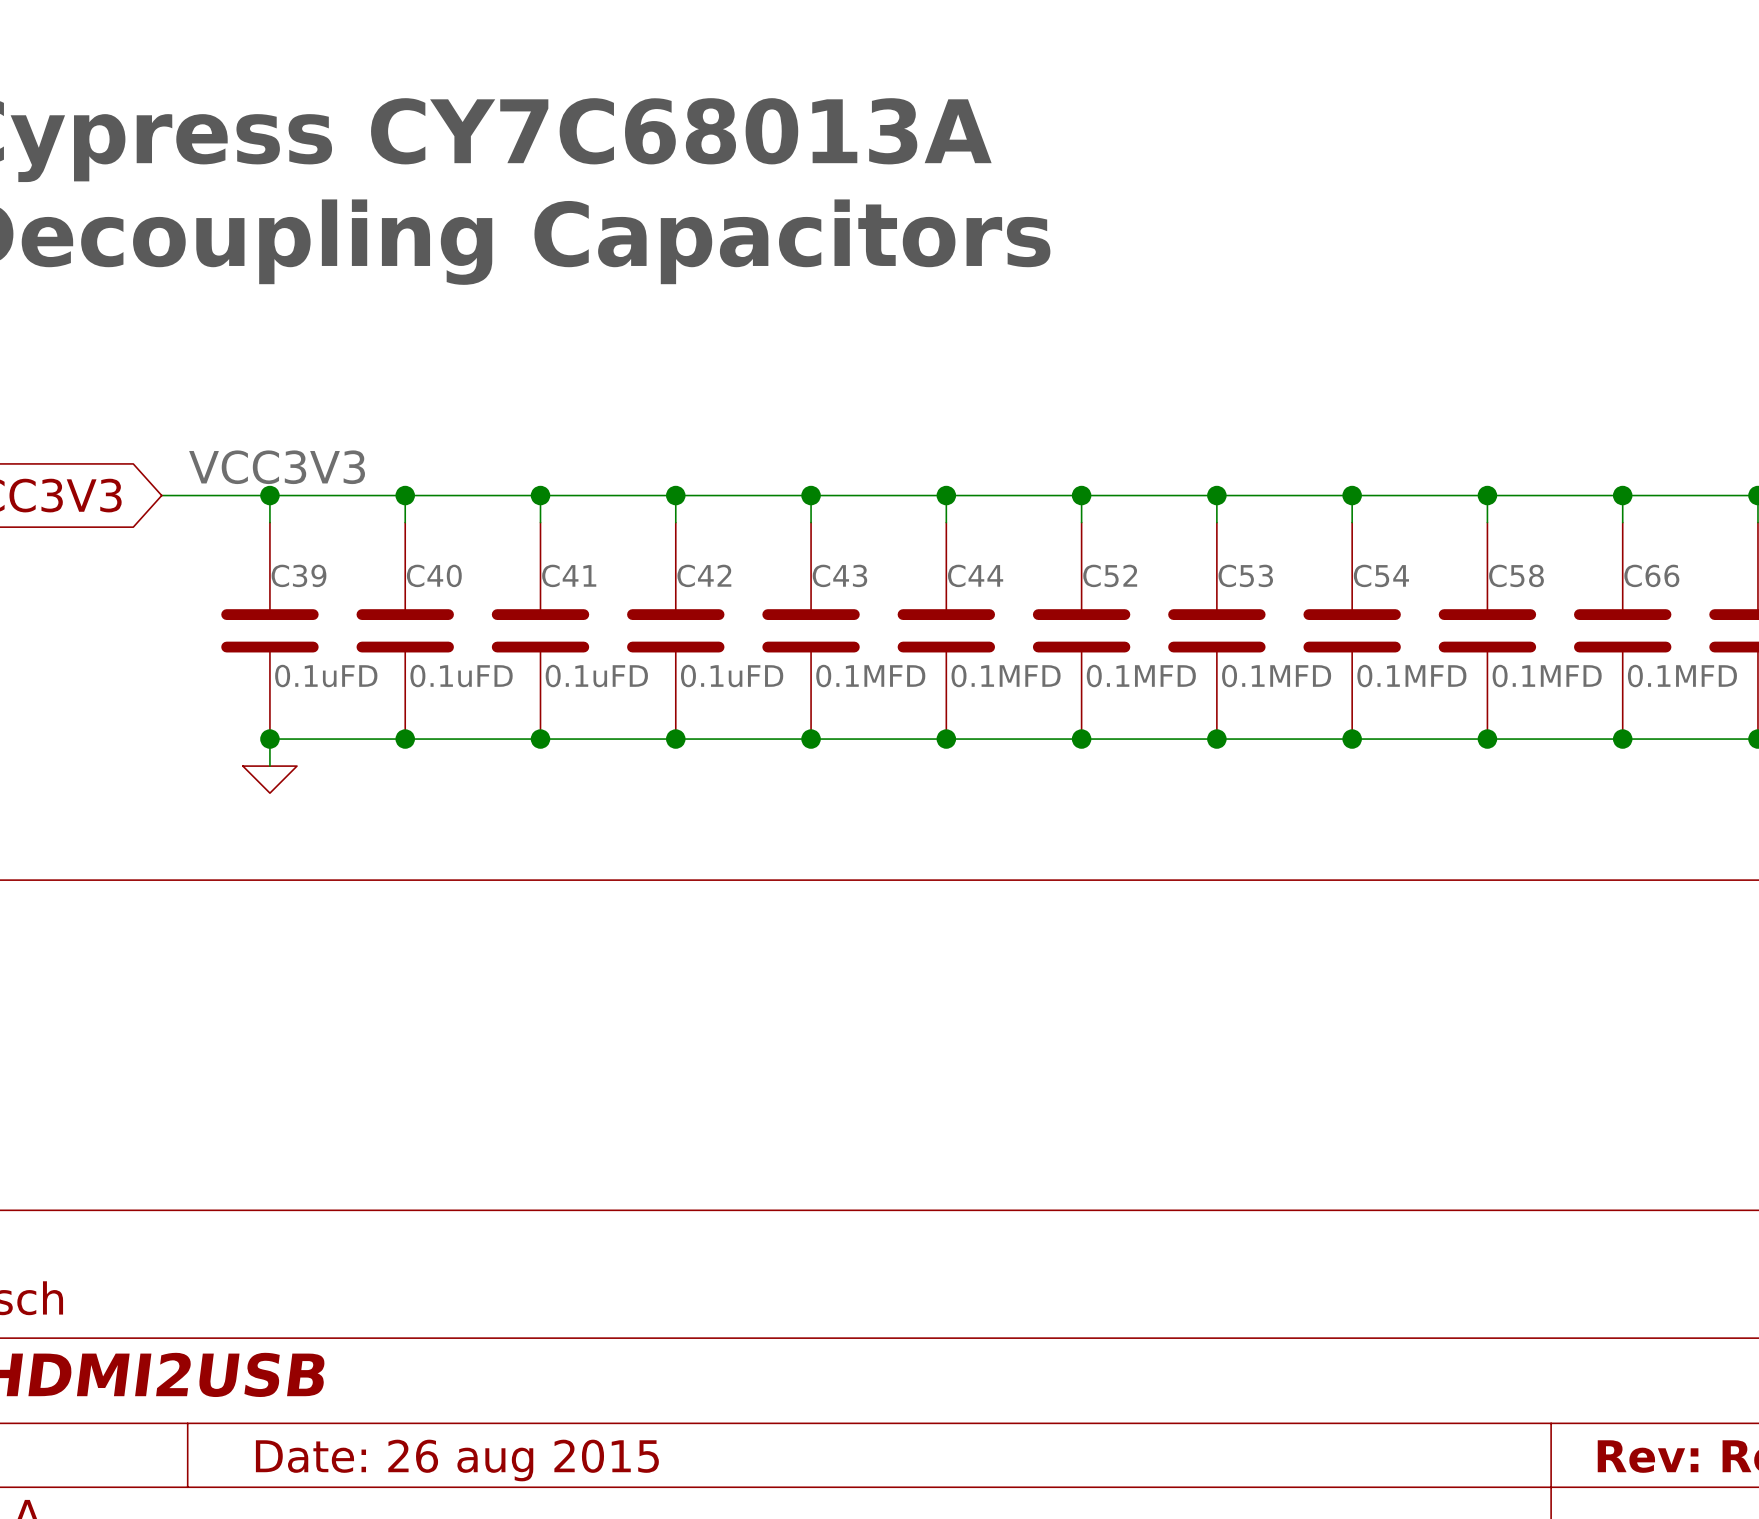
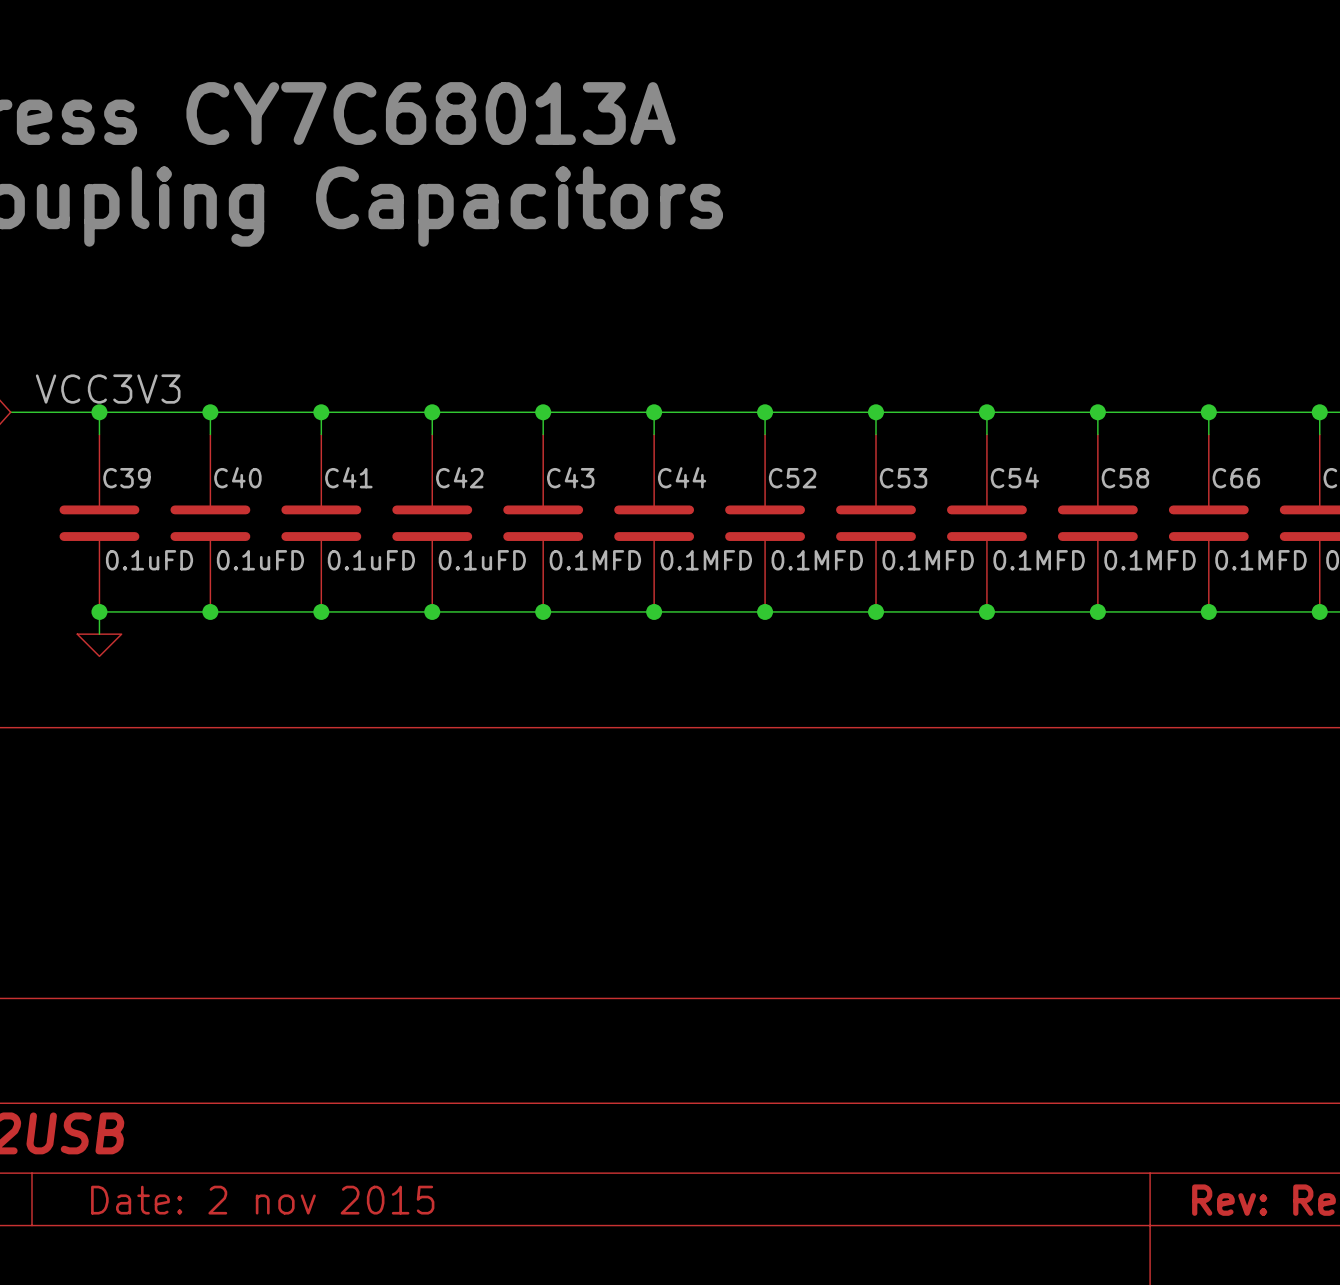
title block: Date: 26 aug 2015 (457, 1460) -> Date: 2 nov 2015 (262, 1200)

